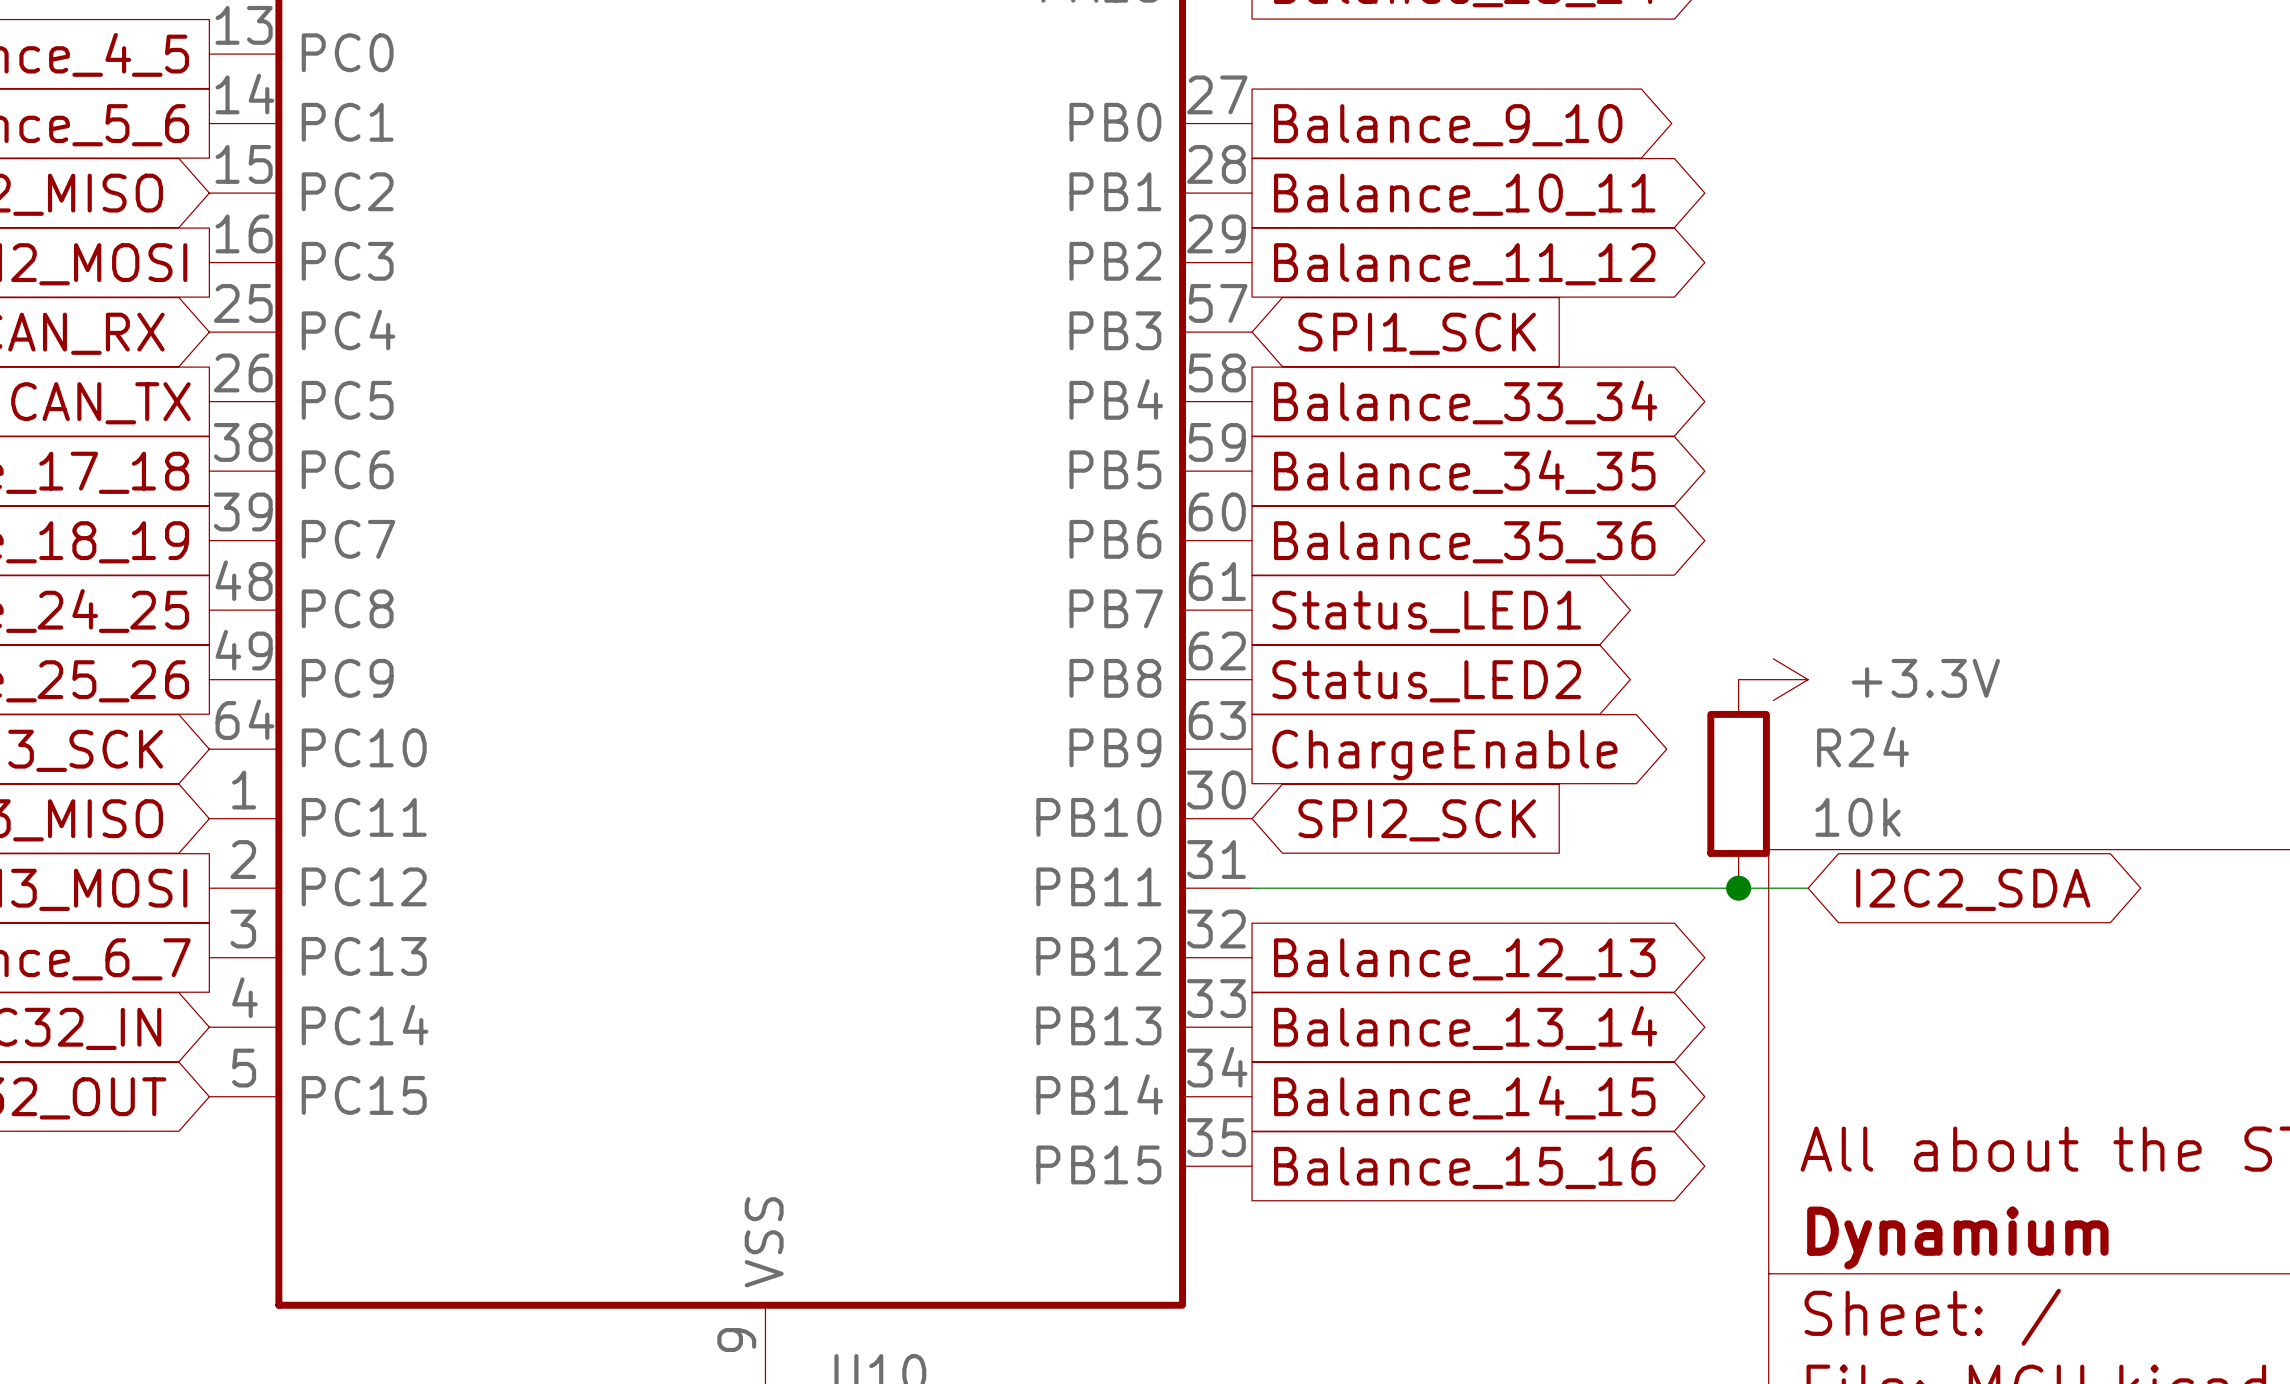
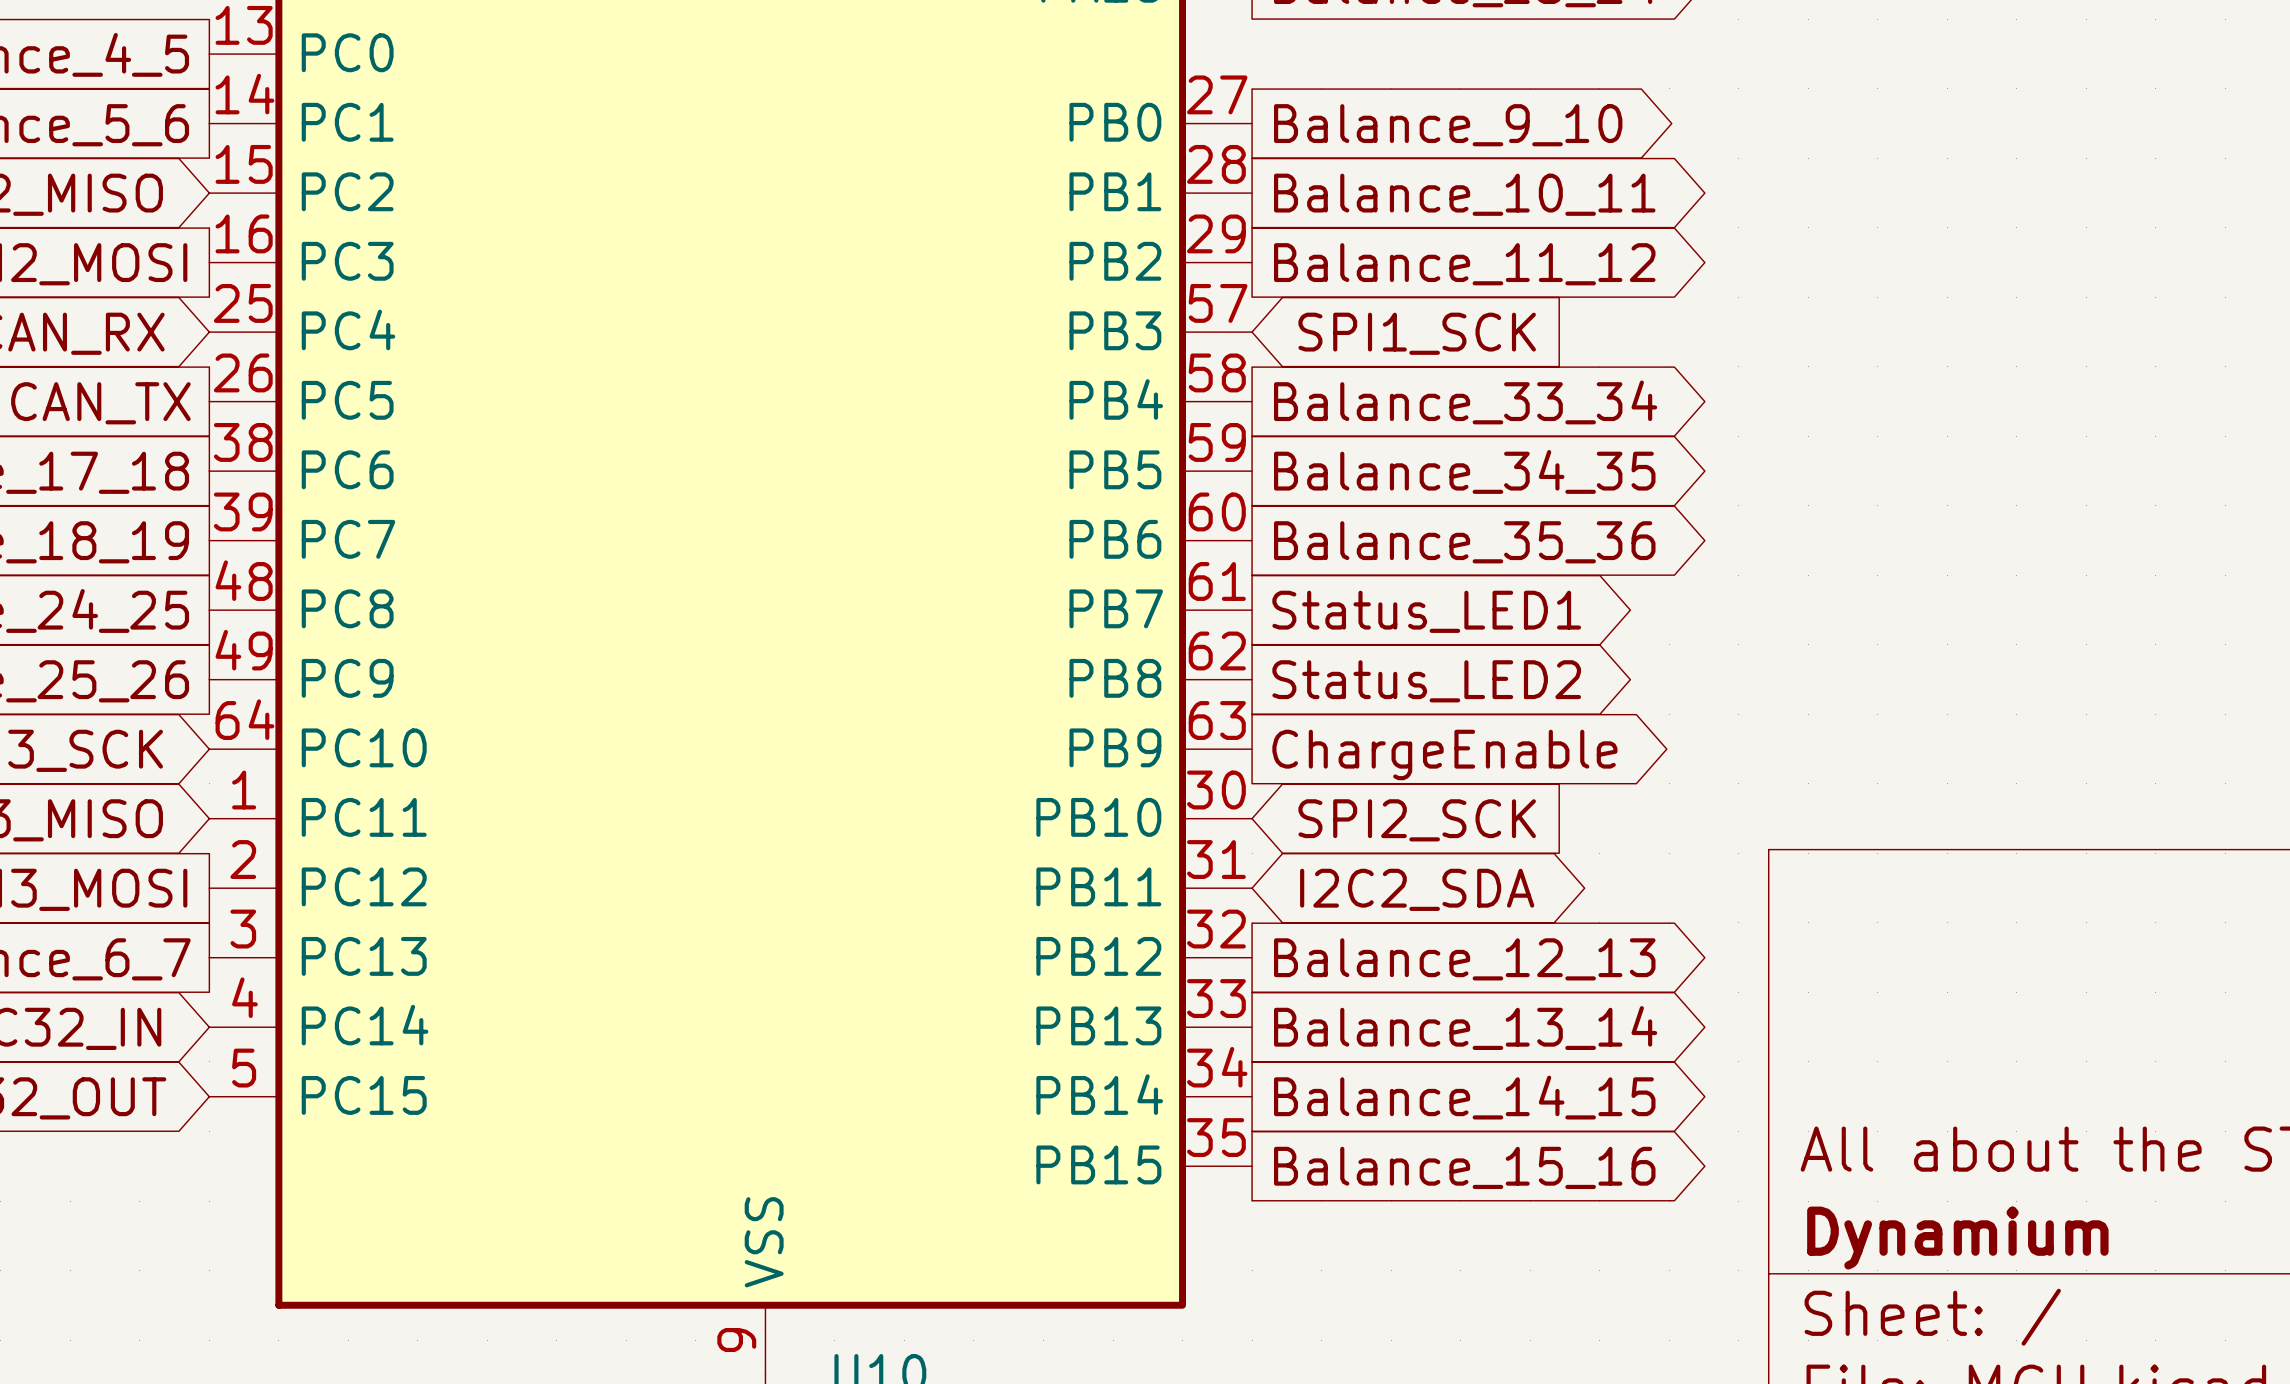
power symbol: +3.3V (1773, 679) -> none
R24: 10k (1738, 783) -> none
wire: (1252, 888) (1808, 888) -> none
junction: (1738, 888) -> none
global label position: I2C2_SDA (1973, 889) -> I2C2_SDA (1417, 889)

